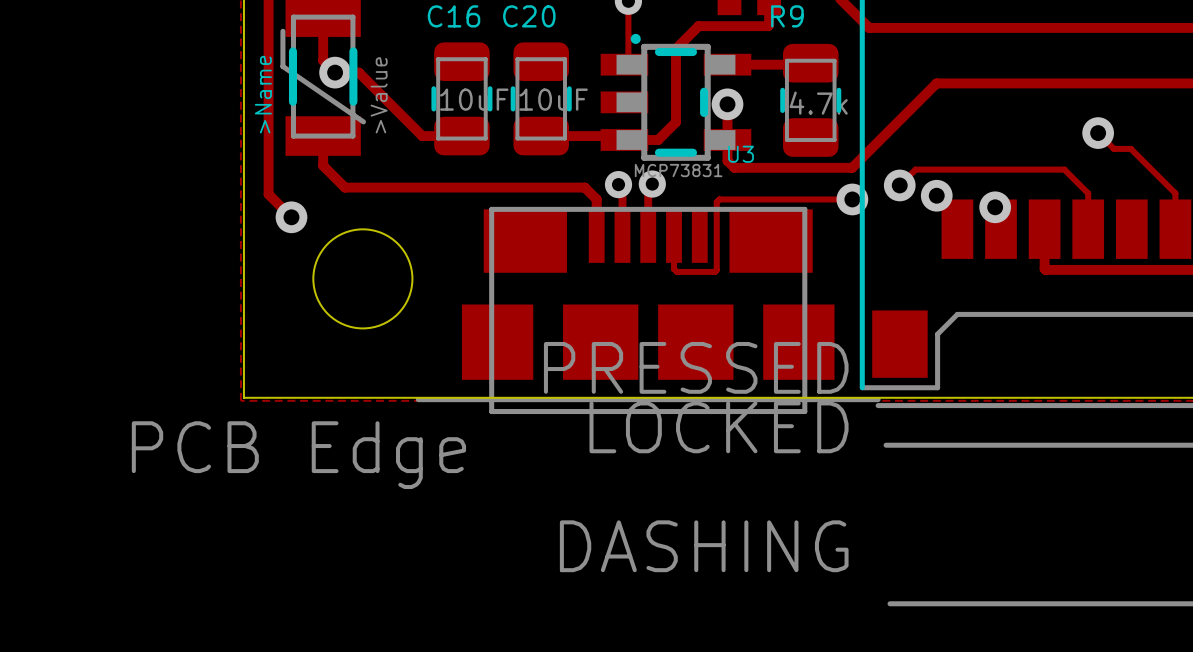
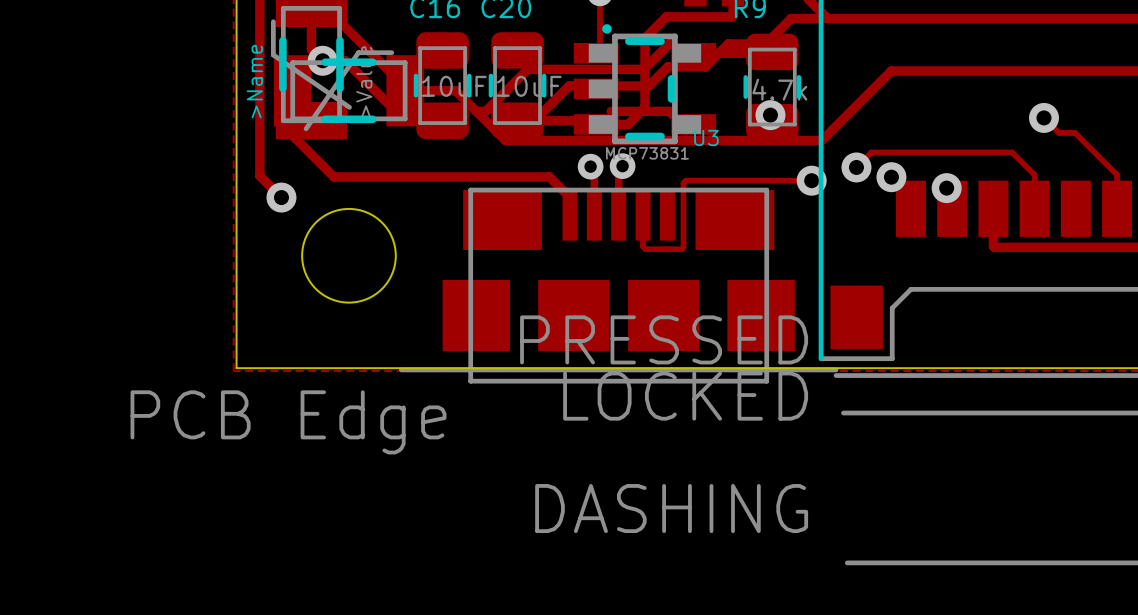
track: none -> (827, 18) (791, 18) (770, 39) (770, 43) (728, 43) (705, 66) (667, 66) (648, 85) (569, 85) (543, 111)
track: none -> (673, 43) (669, 43) (643, 69) (527, 69) (485, 111) (476, 111)
part: none -> (348, 90)
track: (727, 104) (727, 160) (734, 167) (852, 167) (863, 156) -> (315, 12) (330, 12) (405, 87) (405, 90) (455, 90) (505, 140) (821, 140)
via position: (727, 104) -> (770, 115)
track: none -> (611, 111) (669, 111) (673, 115)
track: (323, 136) (323, 165) (345, 187) (584, 187) (596, 199) (596, 217) -> (292, 90) (292, 135) (333, 176) (549, 176) (569, 197)

